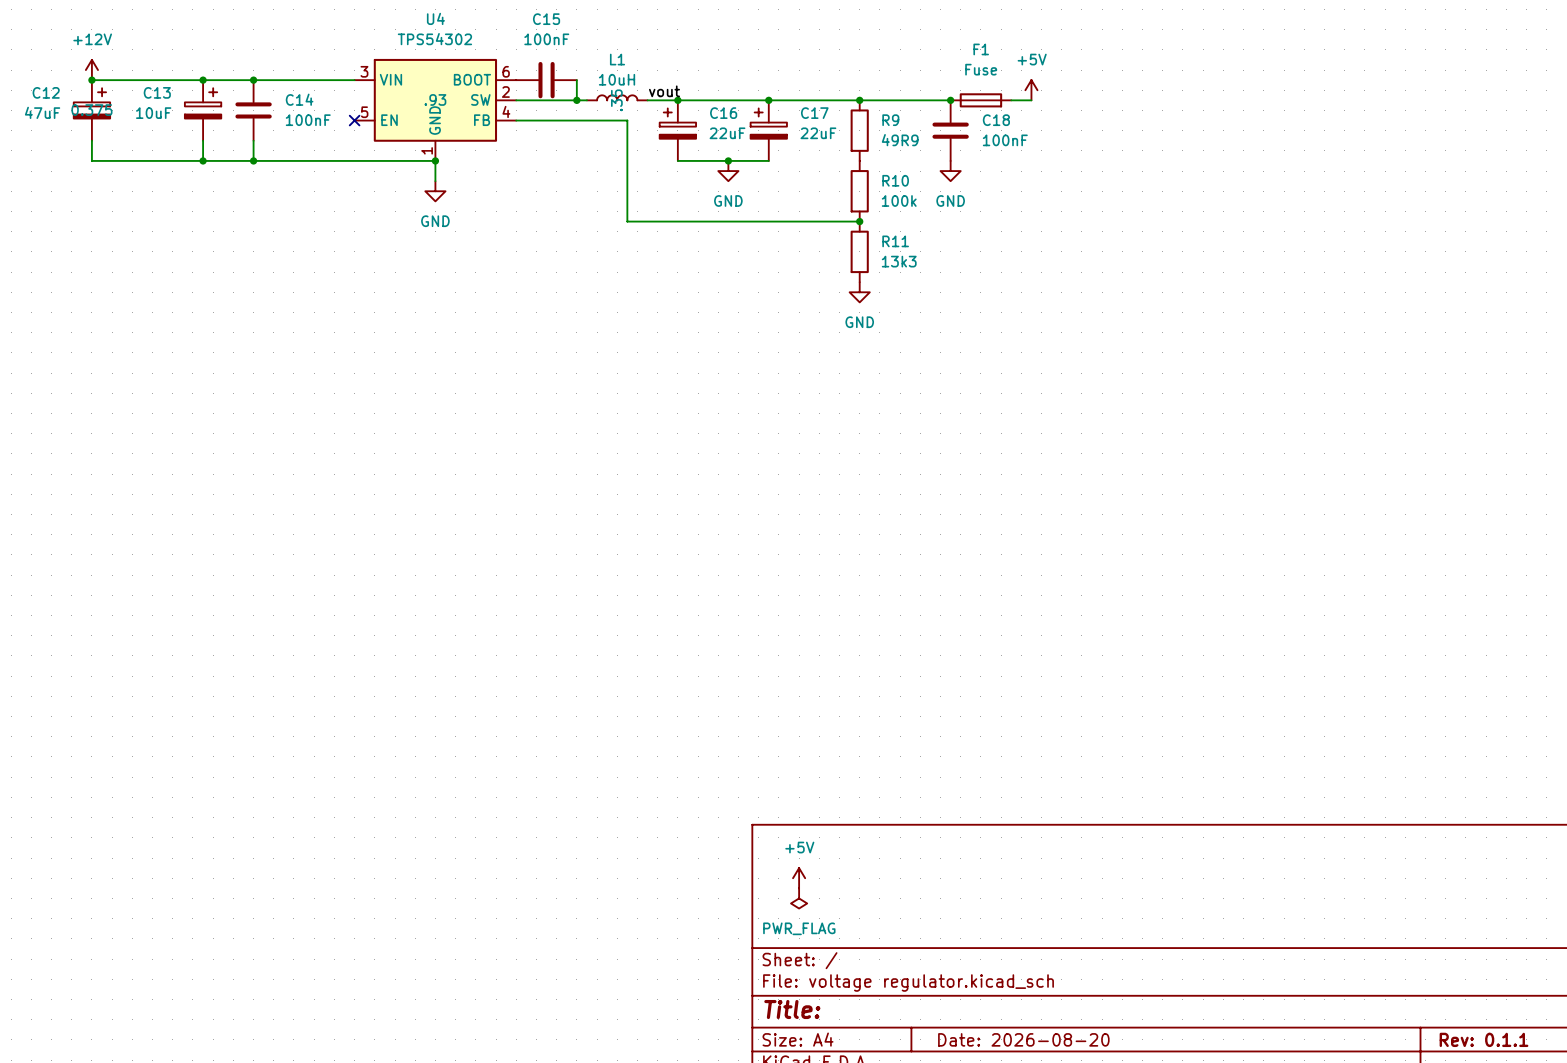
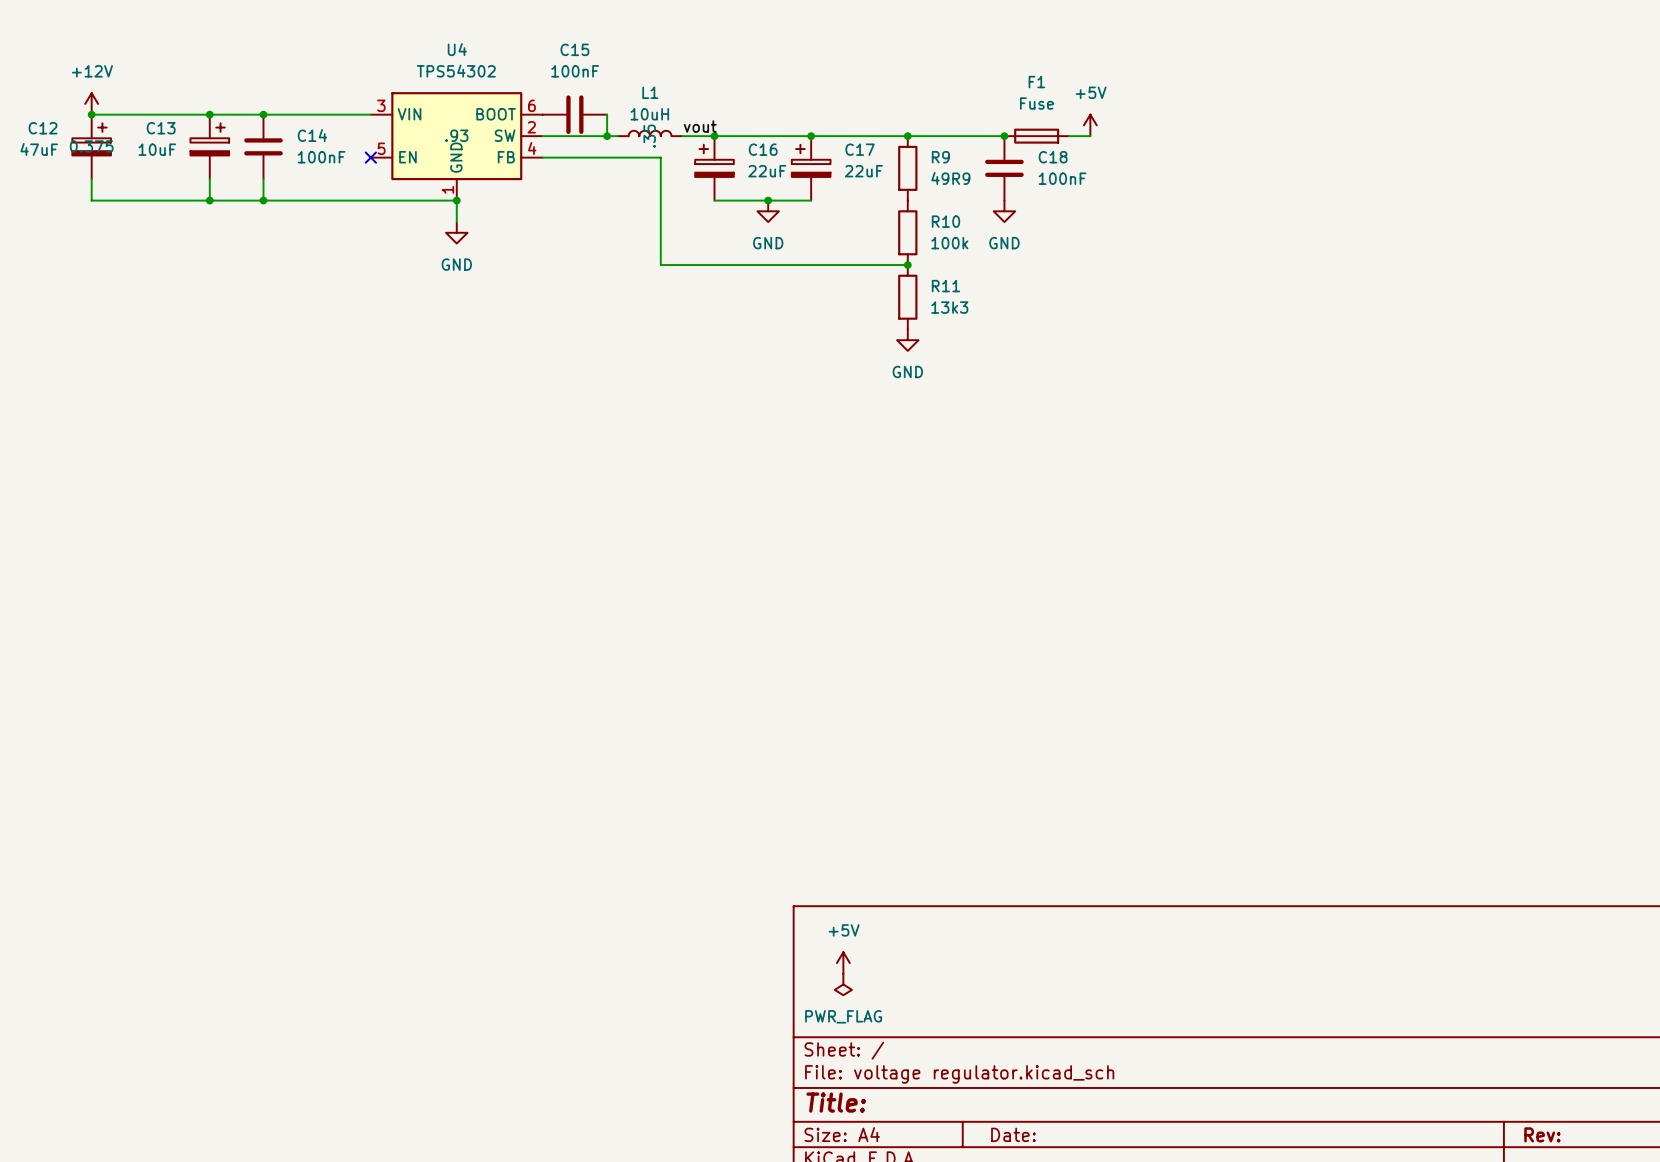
title block: Date: 2026-08-20 (1023, 1039) -> Date: (1013, 1134)
title block: Rev: 0.1.1 (1484, 1039) -> Rev: (1542, 1134)

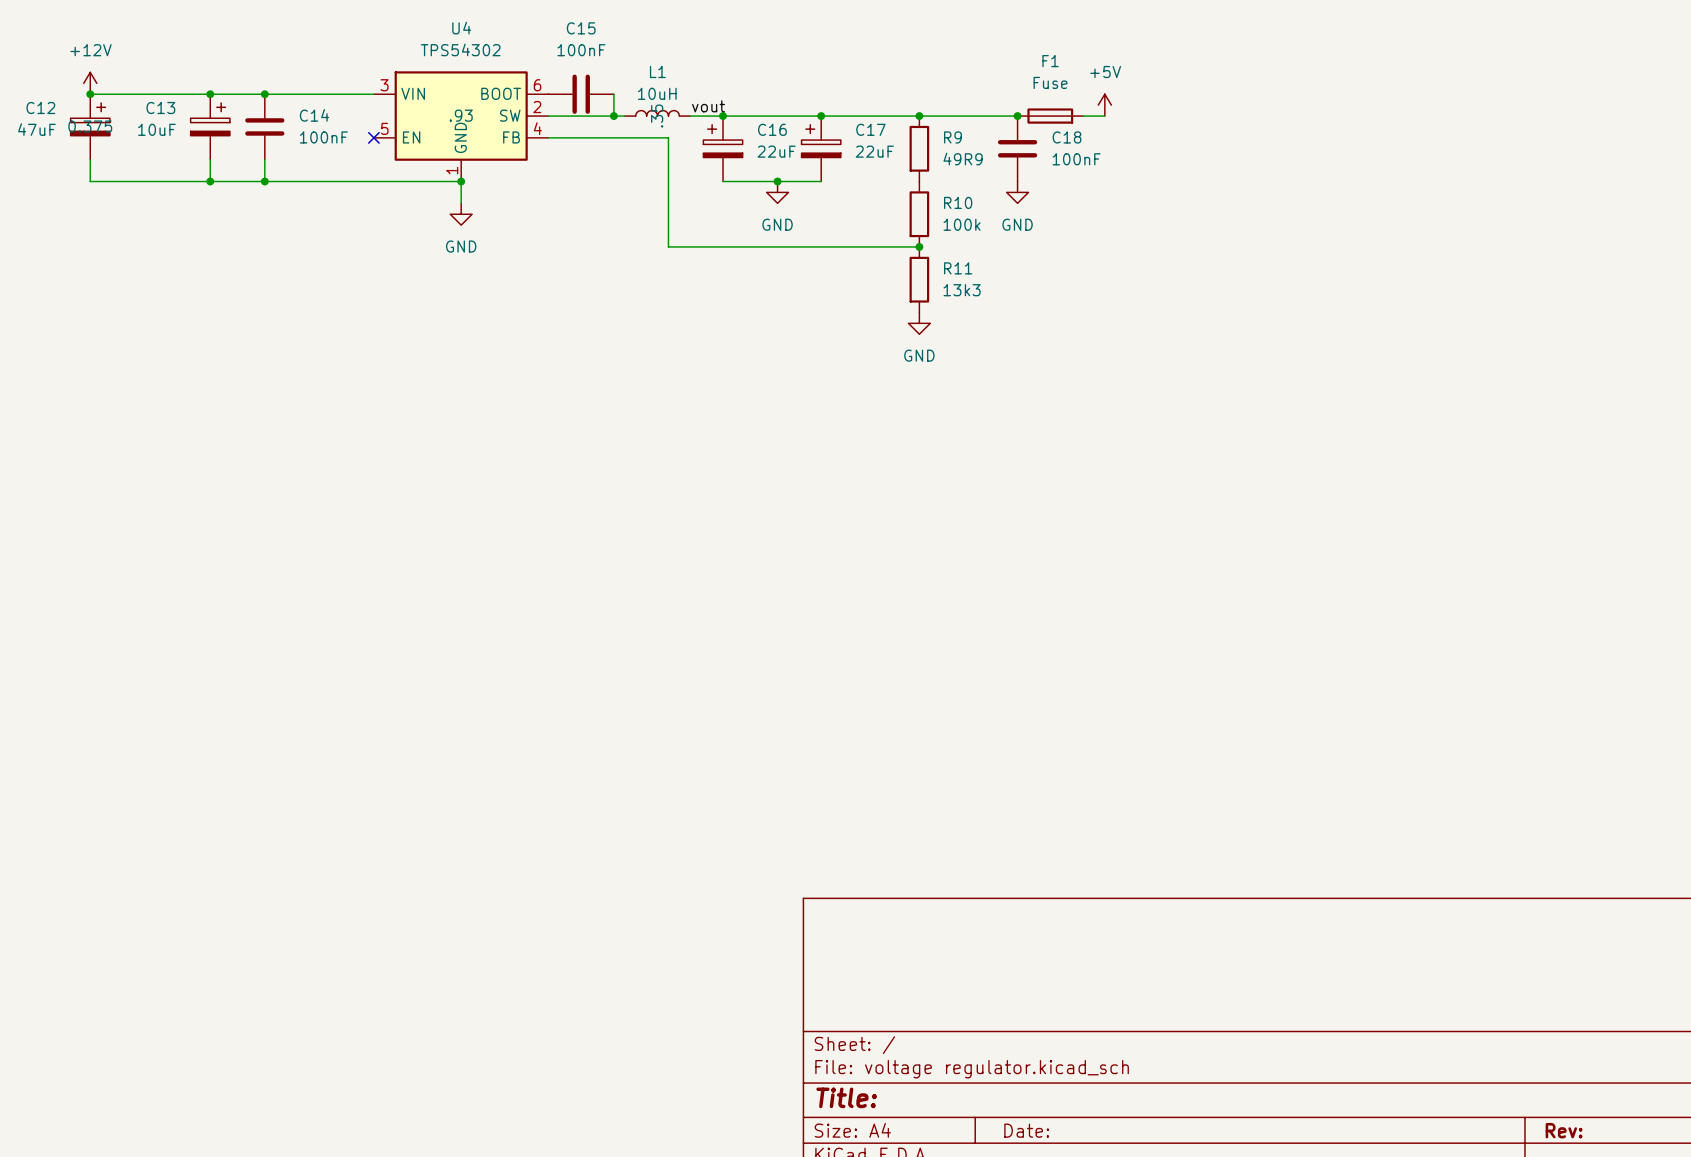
power symbol: +5V (843, 963) -> none
power symbol: PWR_FLAG (843, 984) -> none

